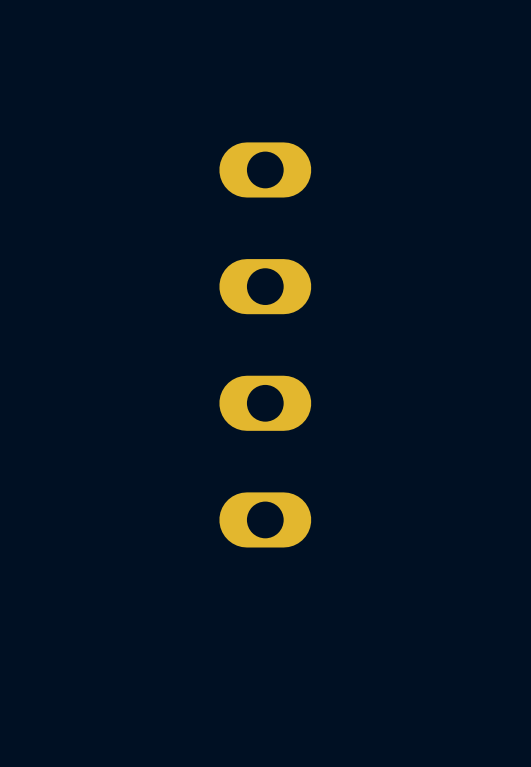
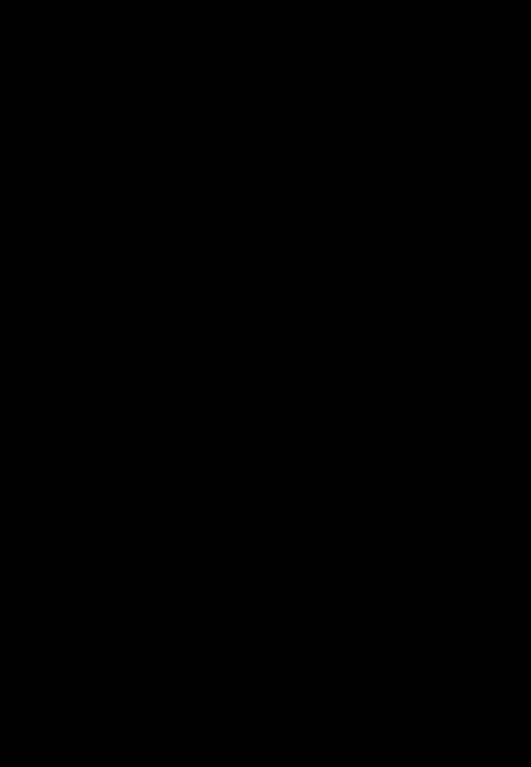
part: (265, 344) -> none

